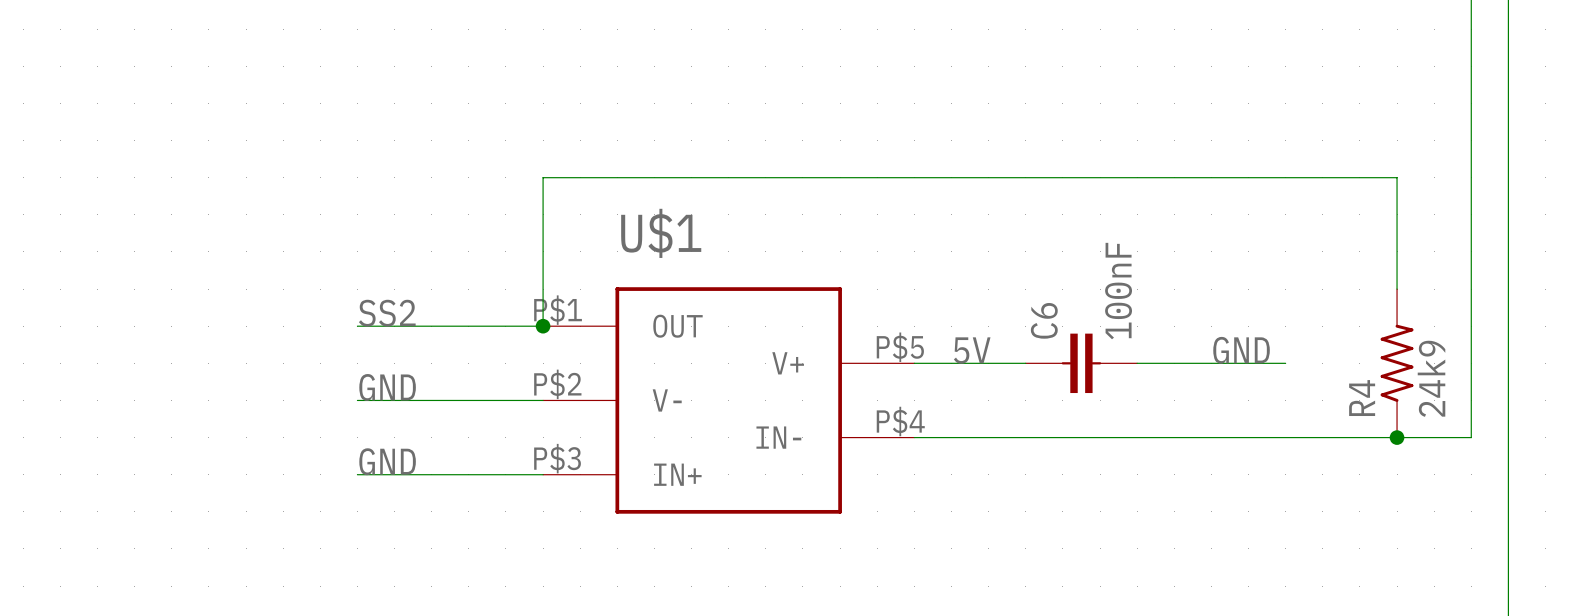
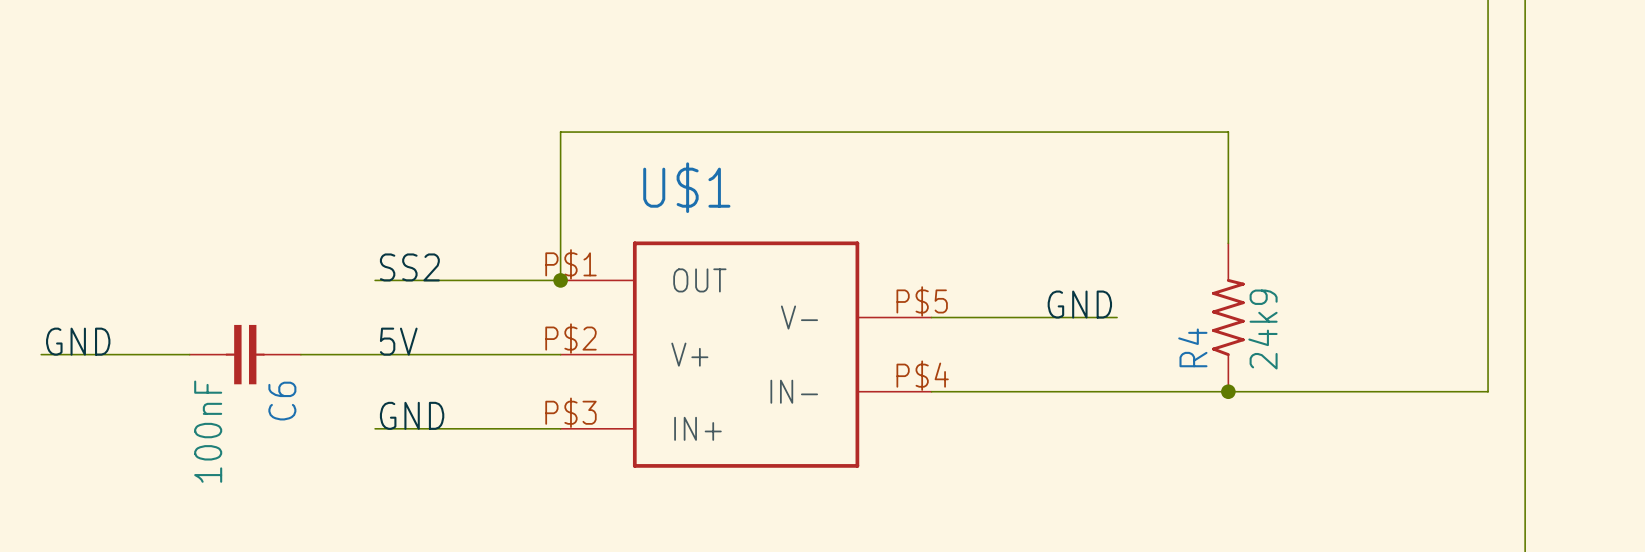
wire: (1211, 177) (1397, 177) (1397, 289) -> (1228, 132) (1228, 243)
C6 value position: 100nF (1118, 291) -> 100nF (208, 431)
C6 name position: C6 (1044, 320) -> C6 (282, 401)
label: 5V (972, 350) -> none
label position: GND (1241, 350) -> GND (1079, 304)
U$1 pin name: V+ (788, 363) -> V- (799, 317)
C6 position: (1081, 363) -> (245, 354)
wire: (1137, 363) (1285, 363) -> none
R4 position: (1397, 363) -> (1228, 317)
label: none -> GND (78, 341)
label: GND (387, 387) -> 5V (398, 341)
wire: none -> (41, 354) (189, 354)
wire: none -> (300, 354) (375, 354)
U$1 pin name: V- (667, 400) -> V+ (689, 354)
junction: none -> (1228, 391)
junction: (1397, 437) -> none

